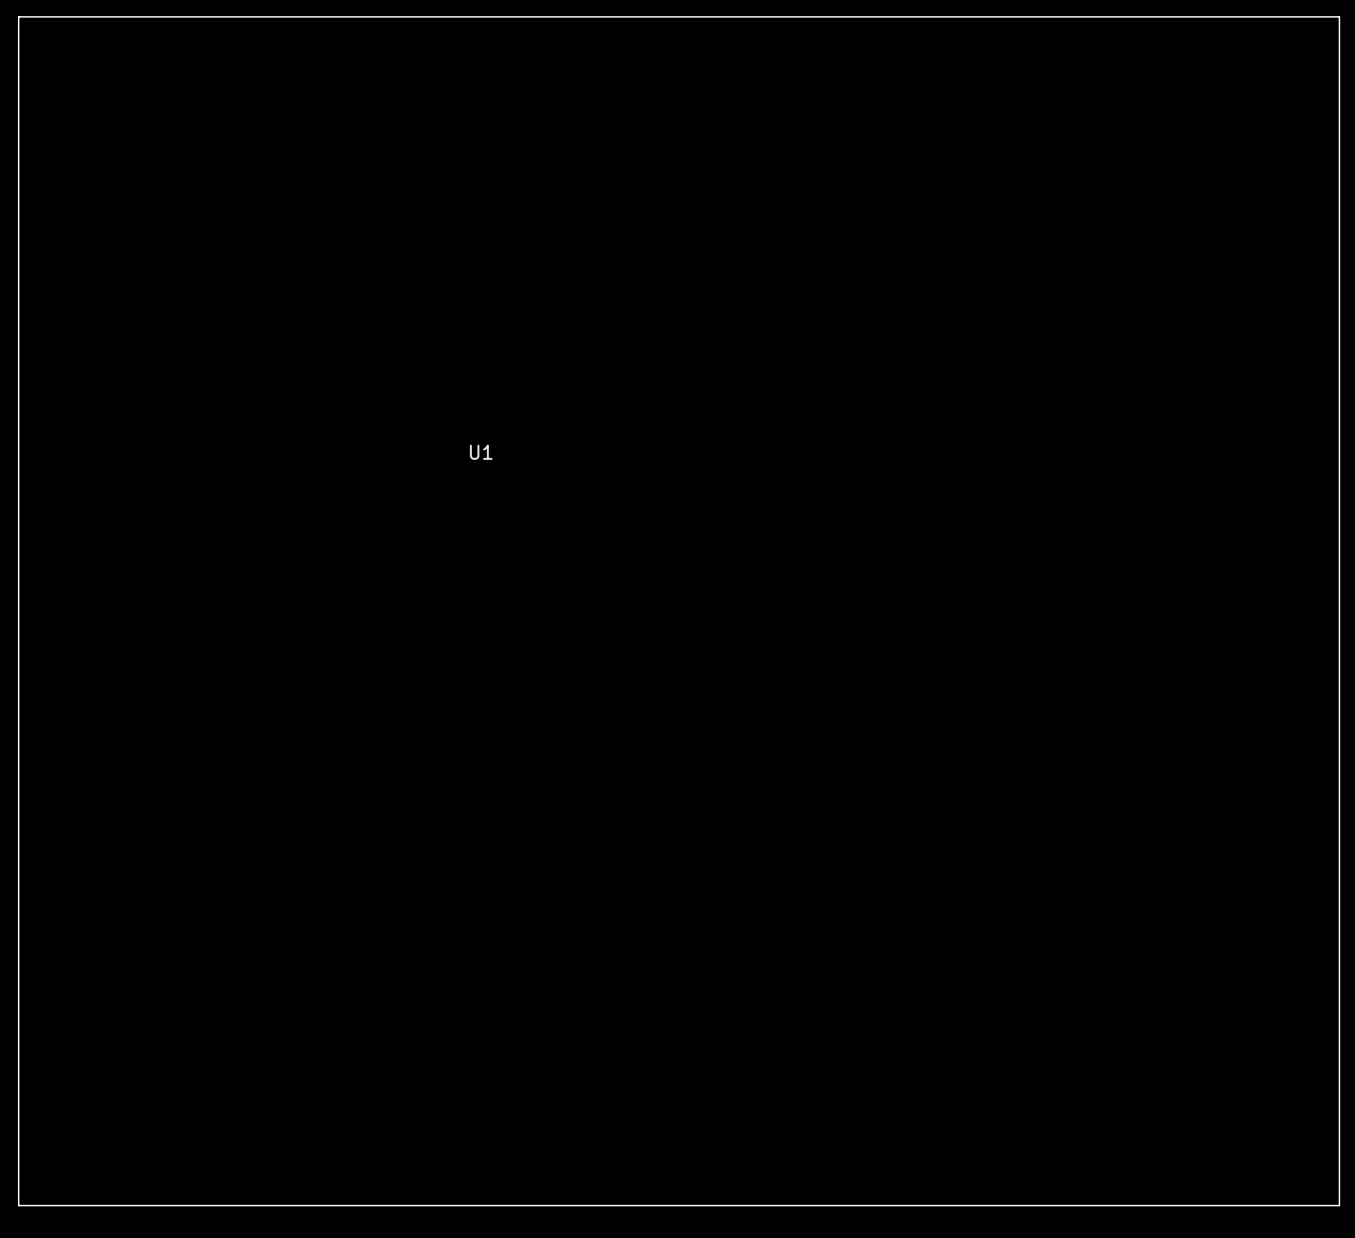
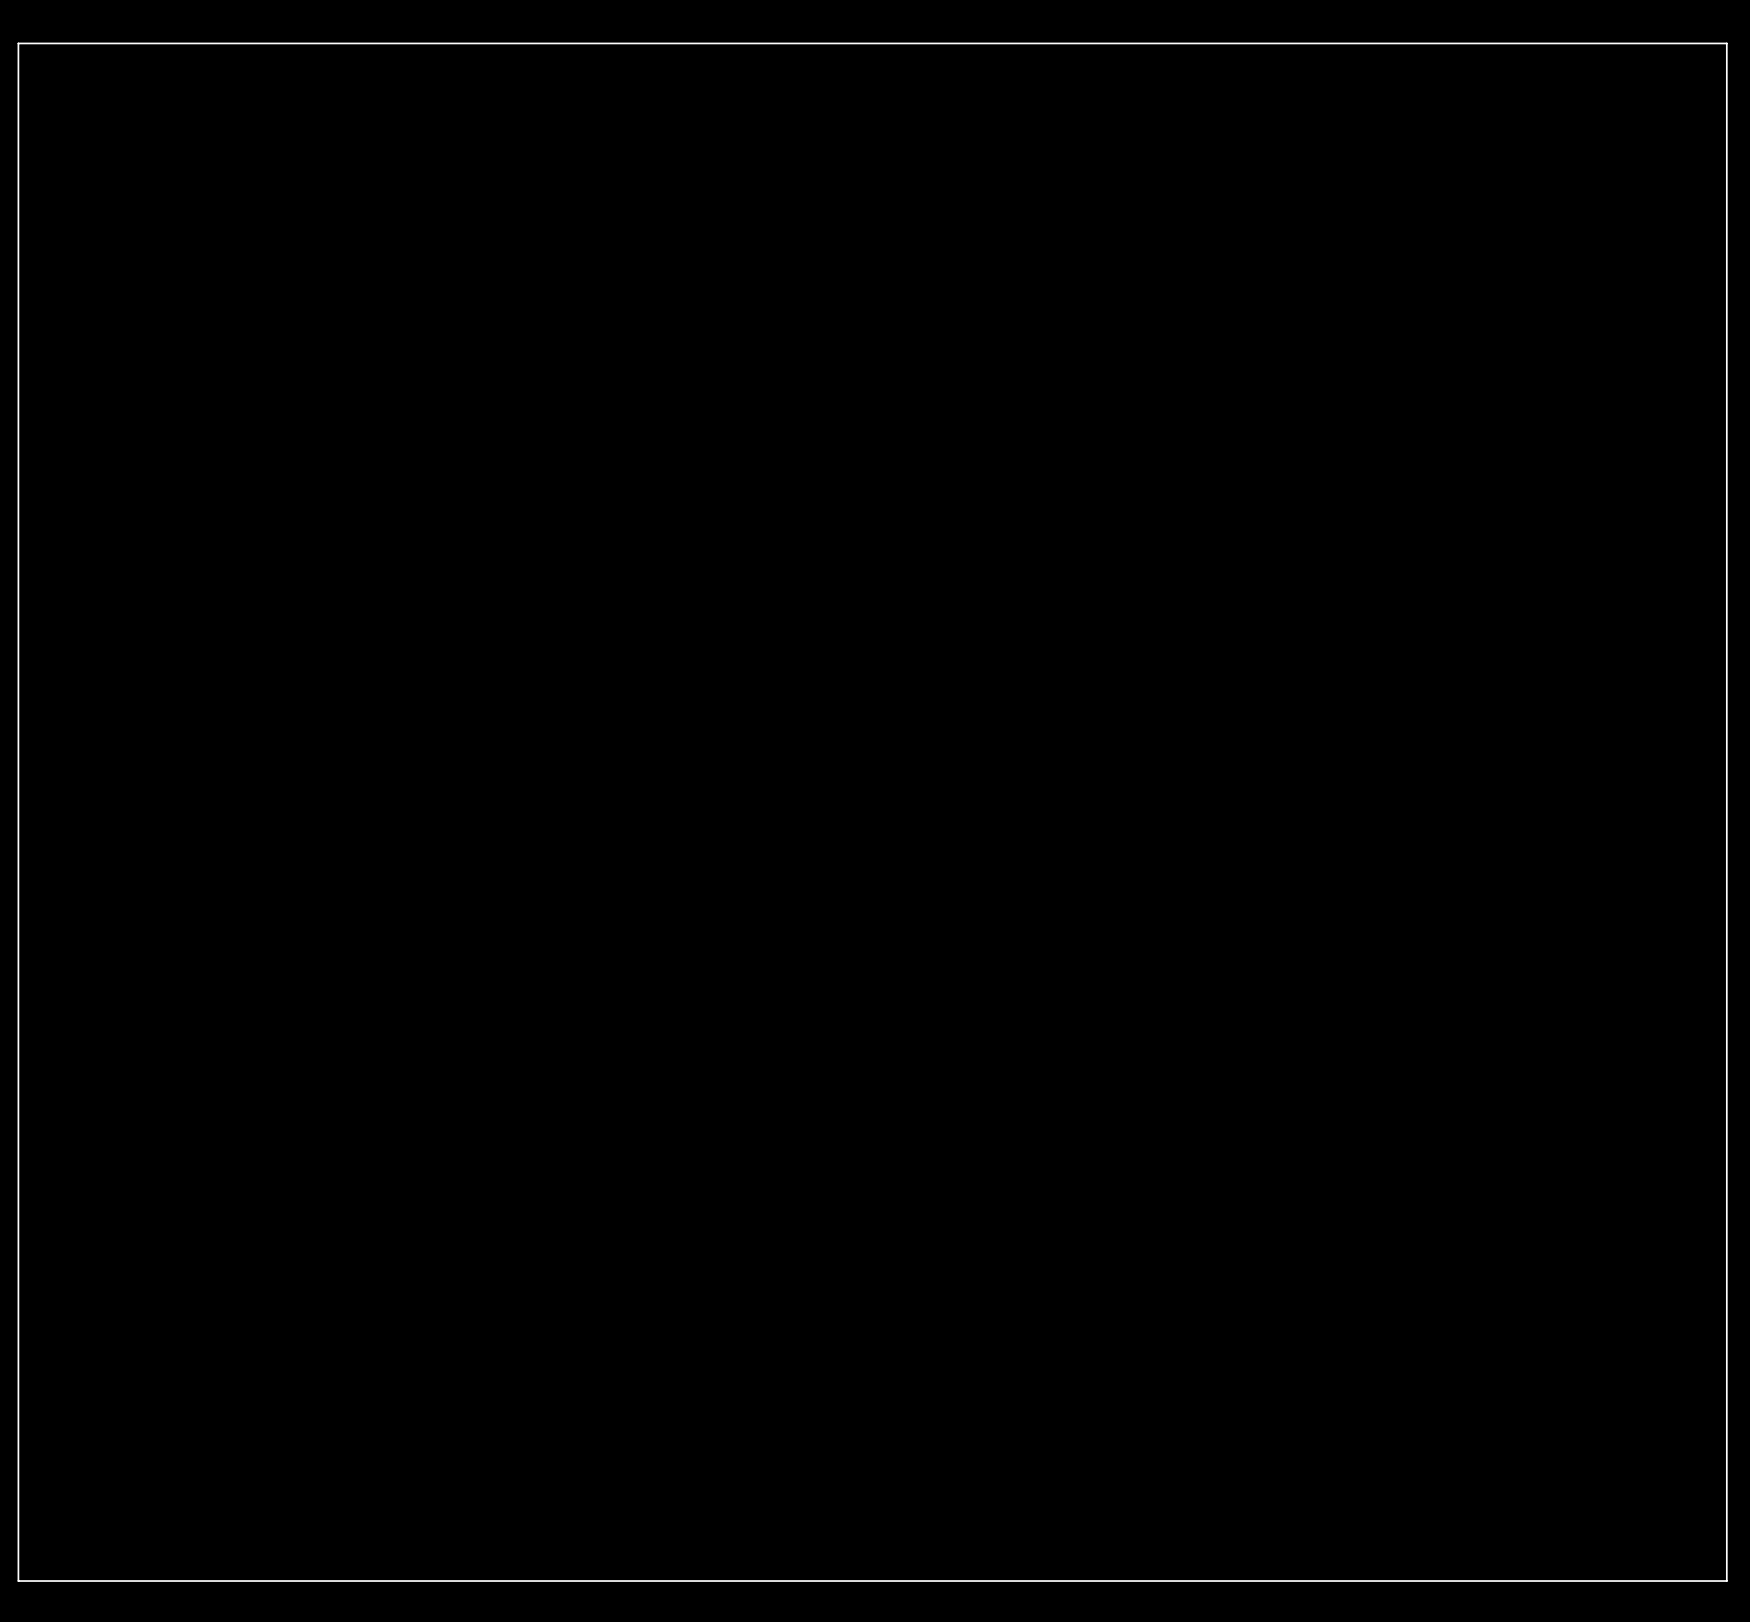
U1: (481, 452) -> none

